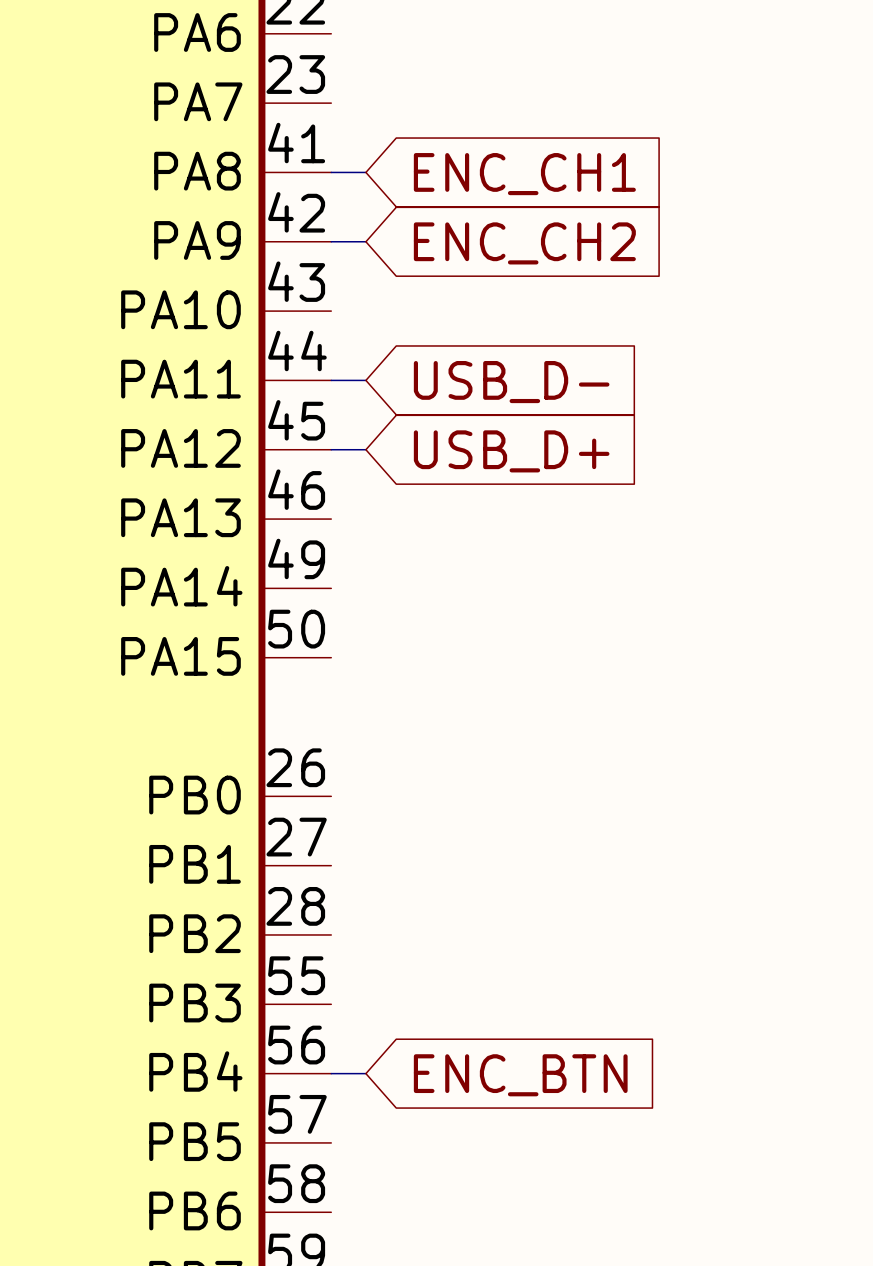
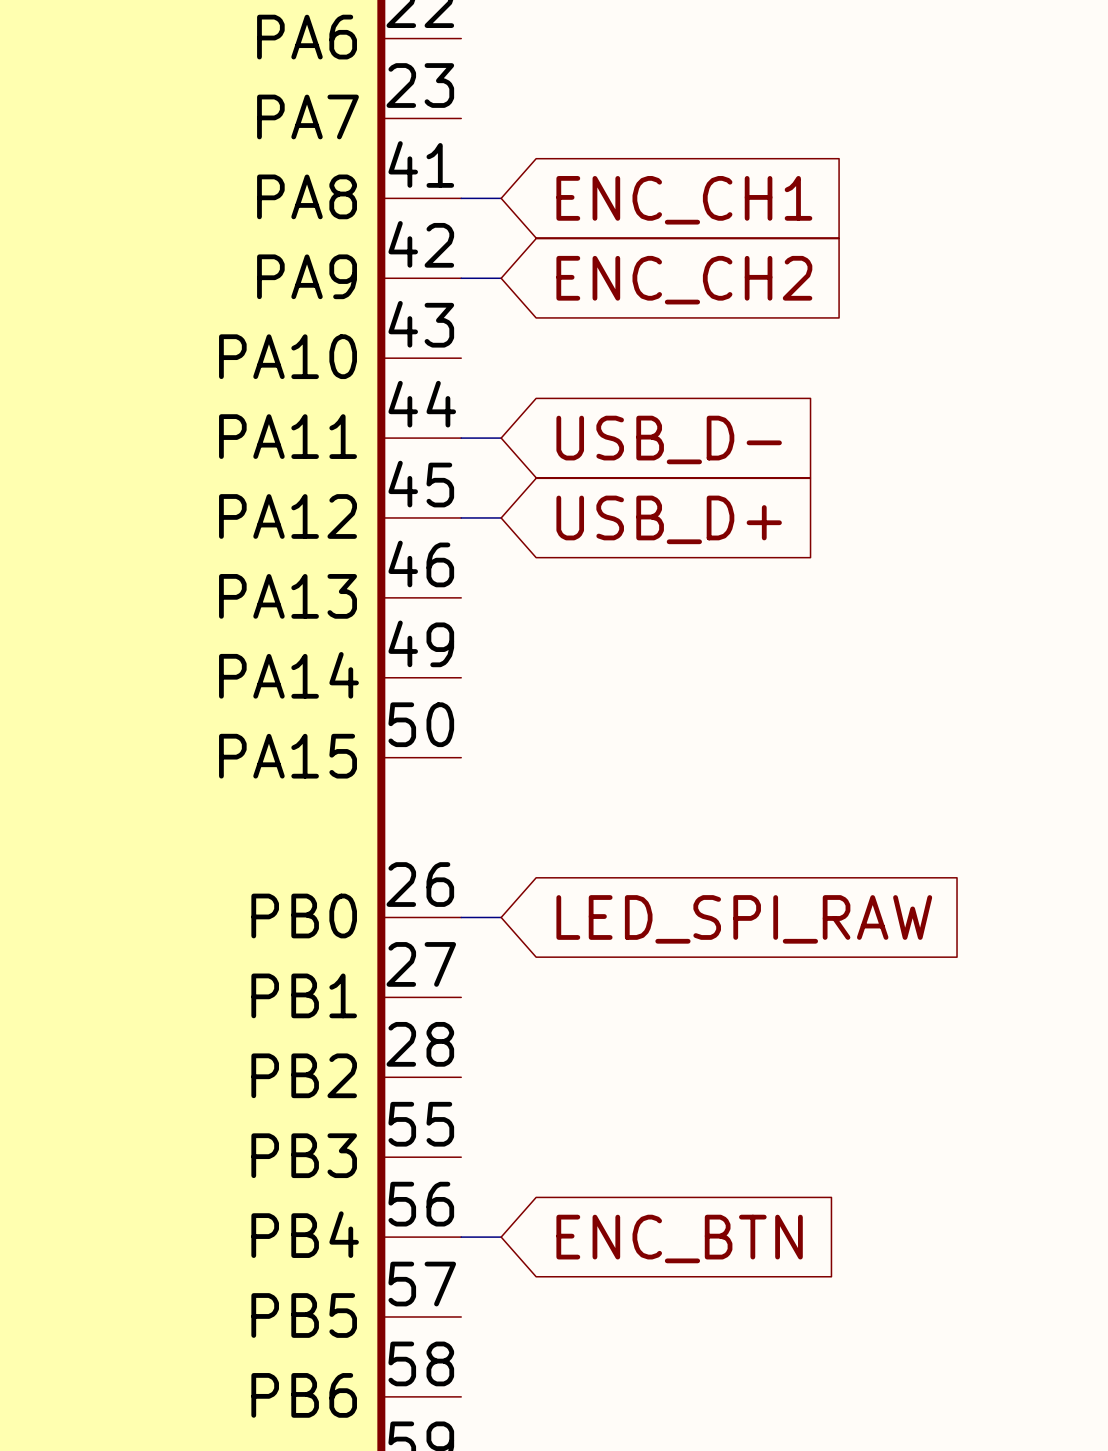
wire: none -> (461, 917) (501, 917)
global label: none -> LED_SPI_RAW (744, 919)

